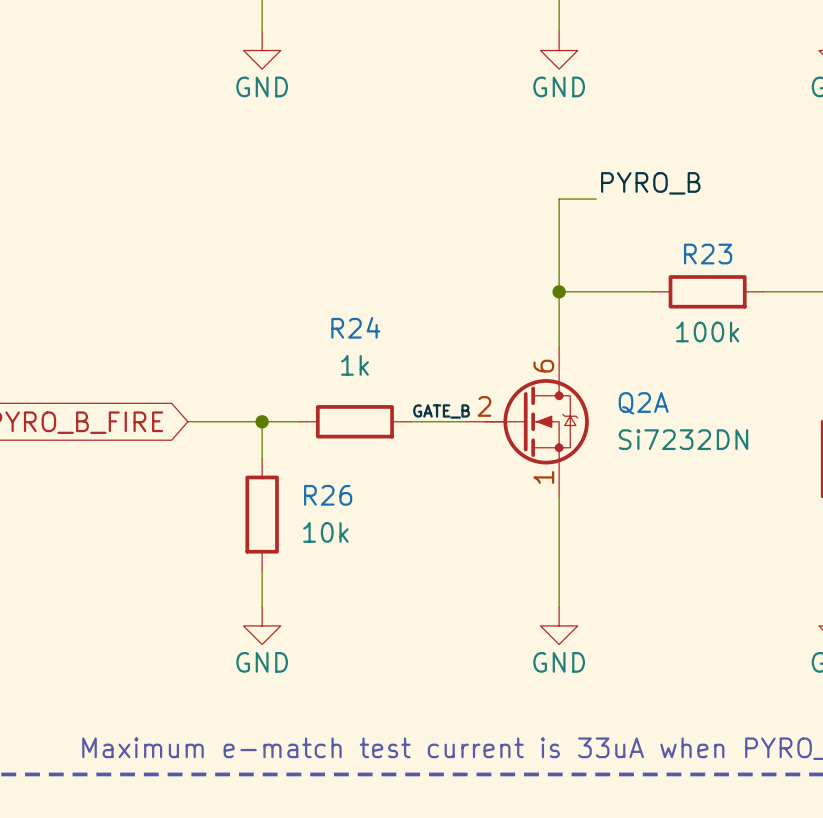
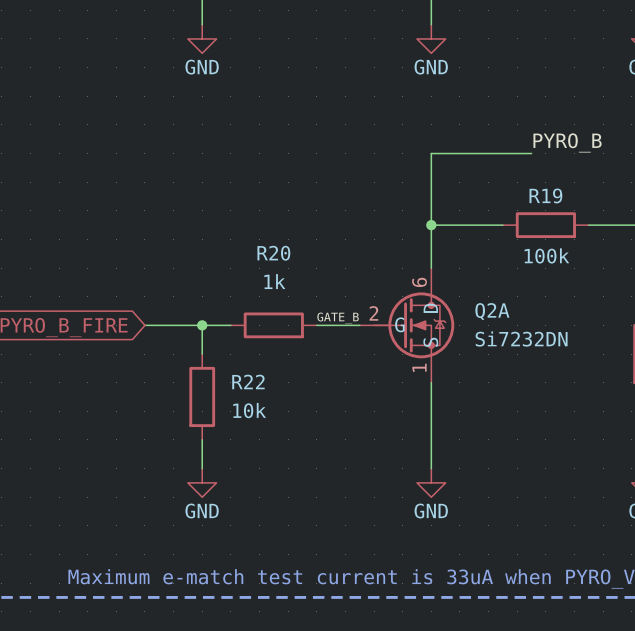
label position: PYRO_B (650, 183) -> PYRO_B (567, 142)
wire: none -> (459, 153) (531, 153)
R23 name: R23 (708, 254) -> R19 (545, 195)
R24 name: R24 (355, 327) -> R20 (273, 253)
Q2A pin name: none -> D (430, 308)
Q2A pin name: none -> G (399, 324)
Q2A pin name: none -> S (430, 342)
R26 name: R26 (328, 495) -> R22 (248, 381)

